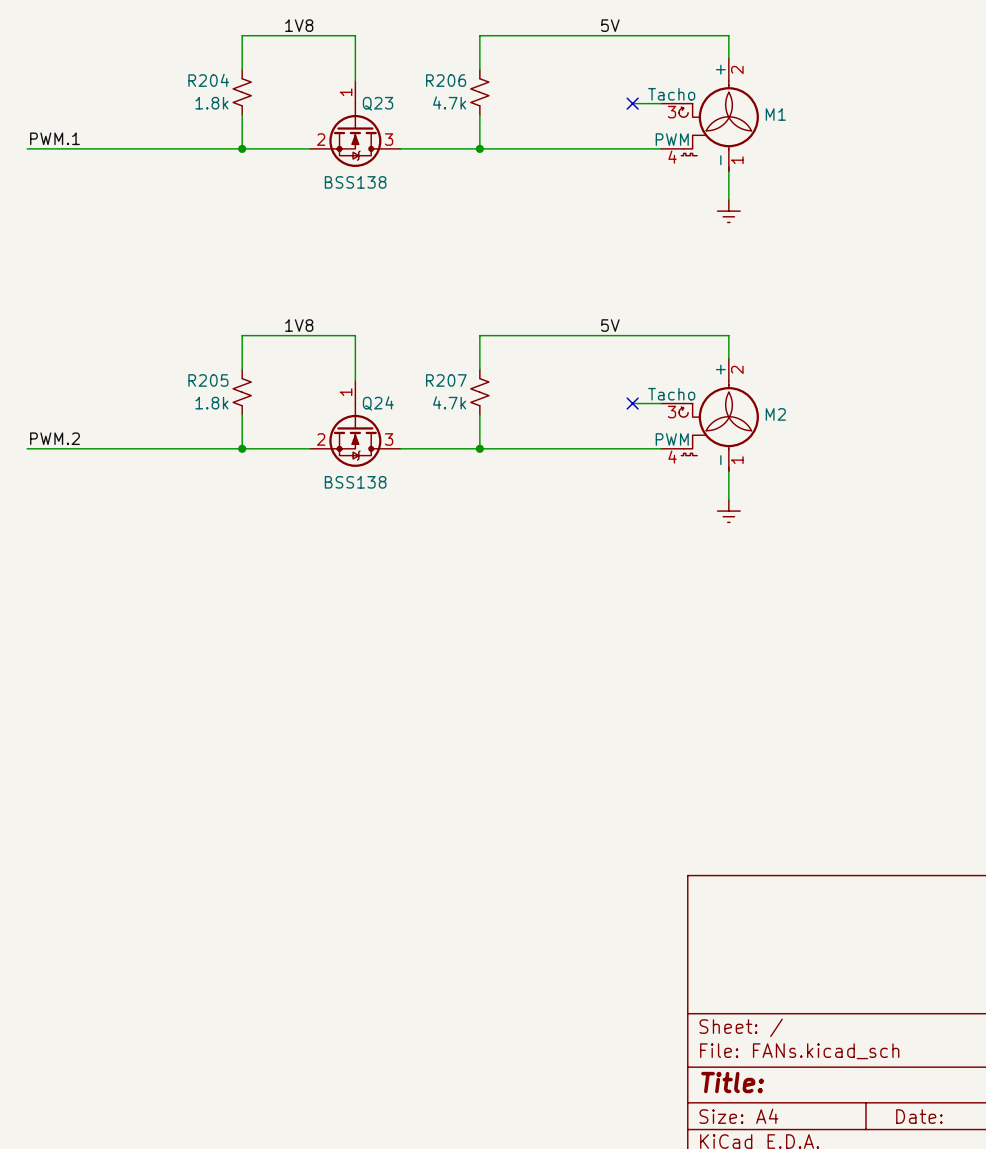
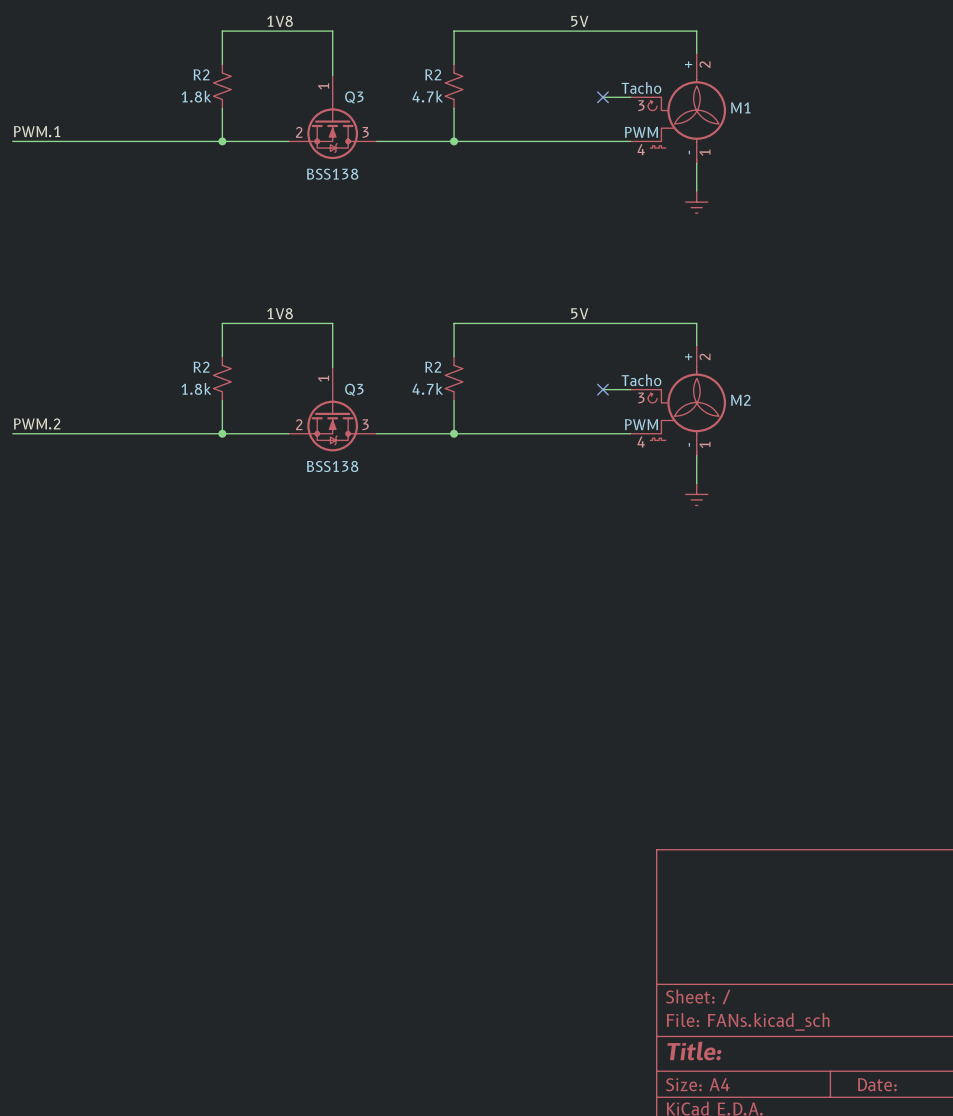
R204 name: R204 (208, 80) -> R2 (201, 74)
R206 name: R206 (446, 80) -> R2 (433, 74)
Q23 name: Q23 (378, 103) -> Q3 (354, 97)
R205 name: R205 (208, 380) -> R2 (201, 367)
R207 name: R207 (446, 380) -> R2 (433, 367)
Q24 name: Q24 (378, 403) -> Q3 (354, 389)

